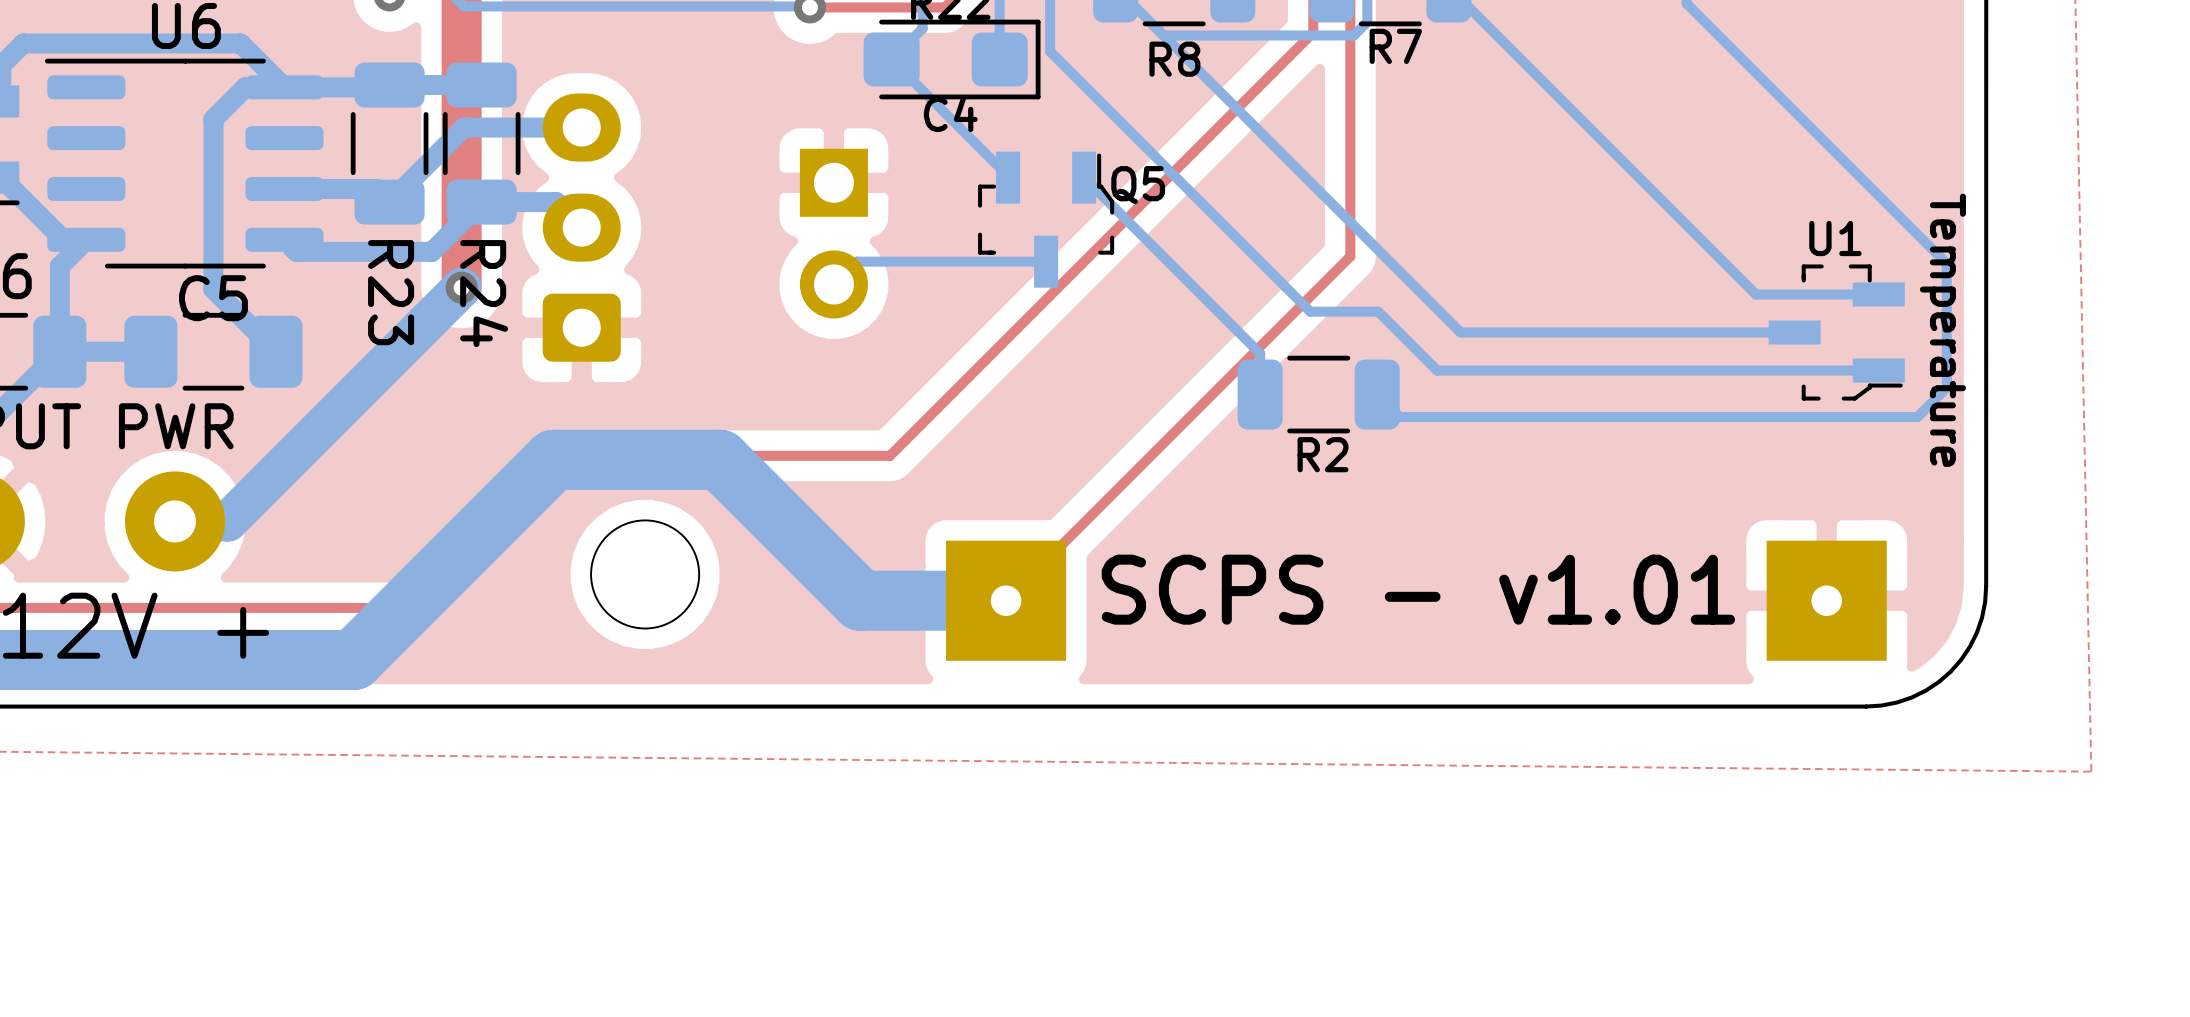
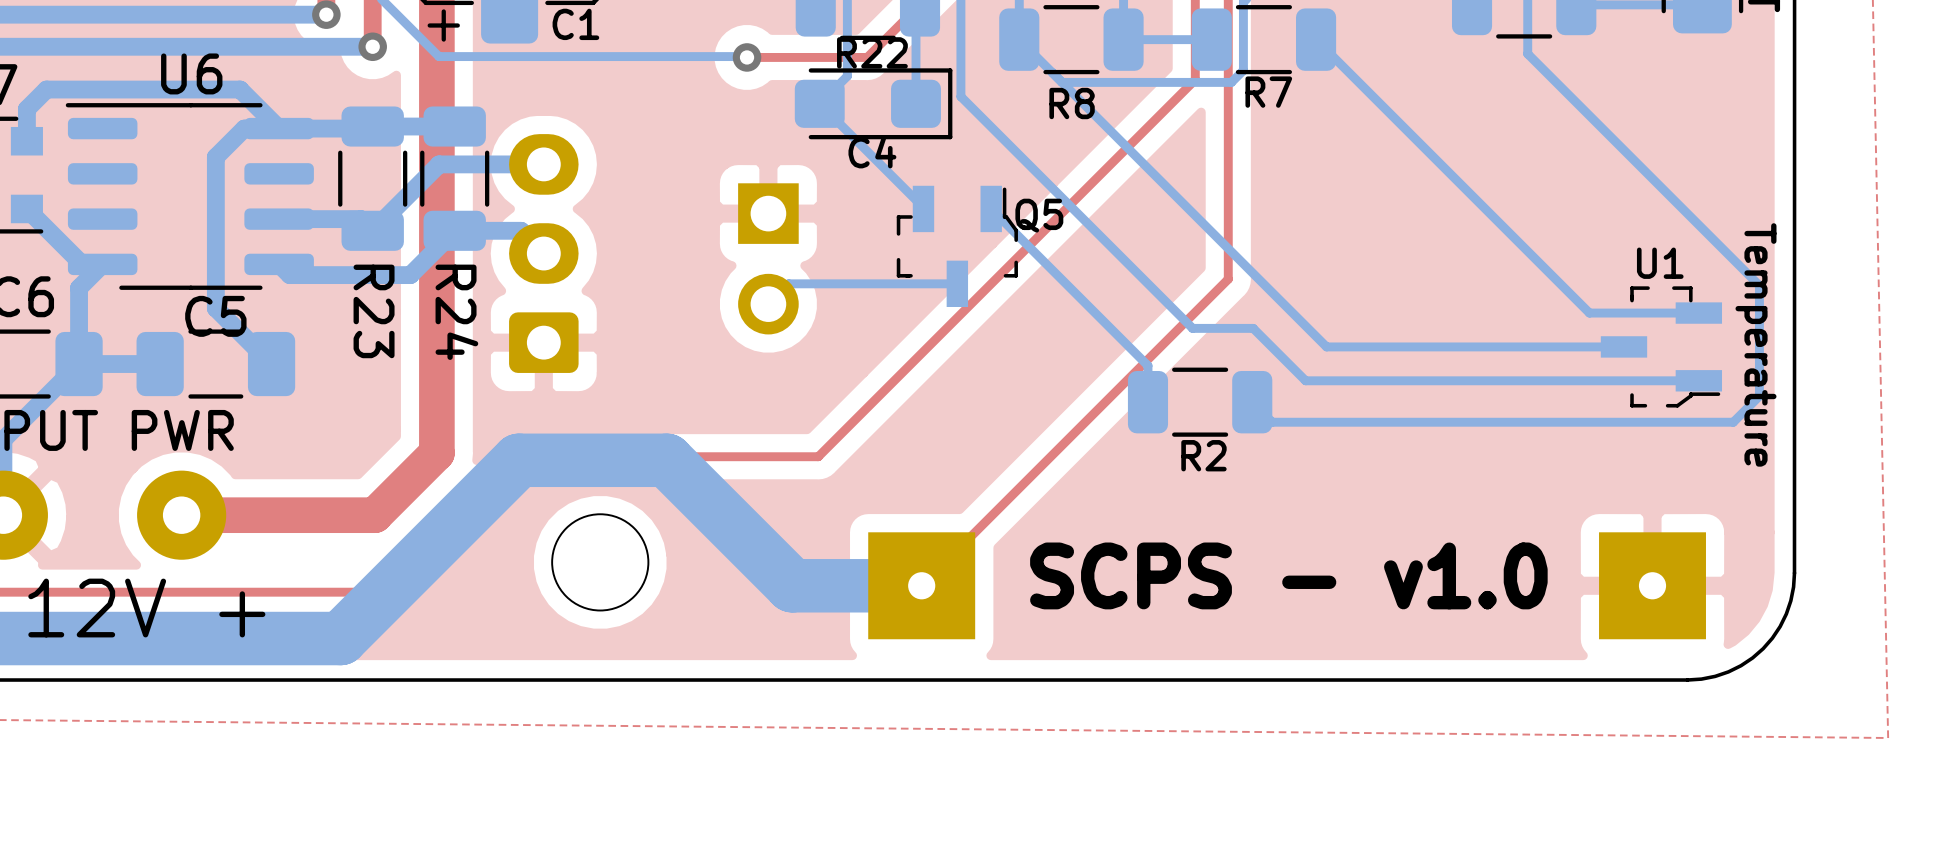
bottom track: (461, 287) (227, 521) (175, 521) -> none
top track: none -> (436, 307) (436, 453) (374, 515) (181, 515)
via: (461, 287) -> none
text: SCPS - v1.01 (1418, 589) -> SCPS - v1.0 (1288, 575)

